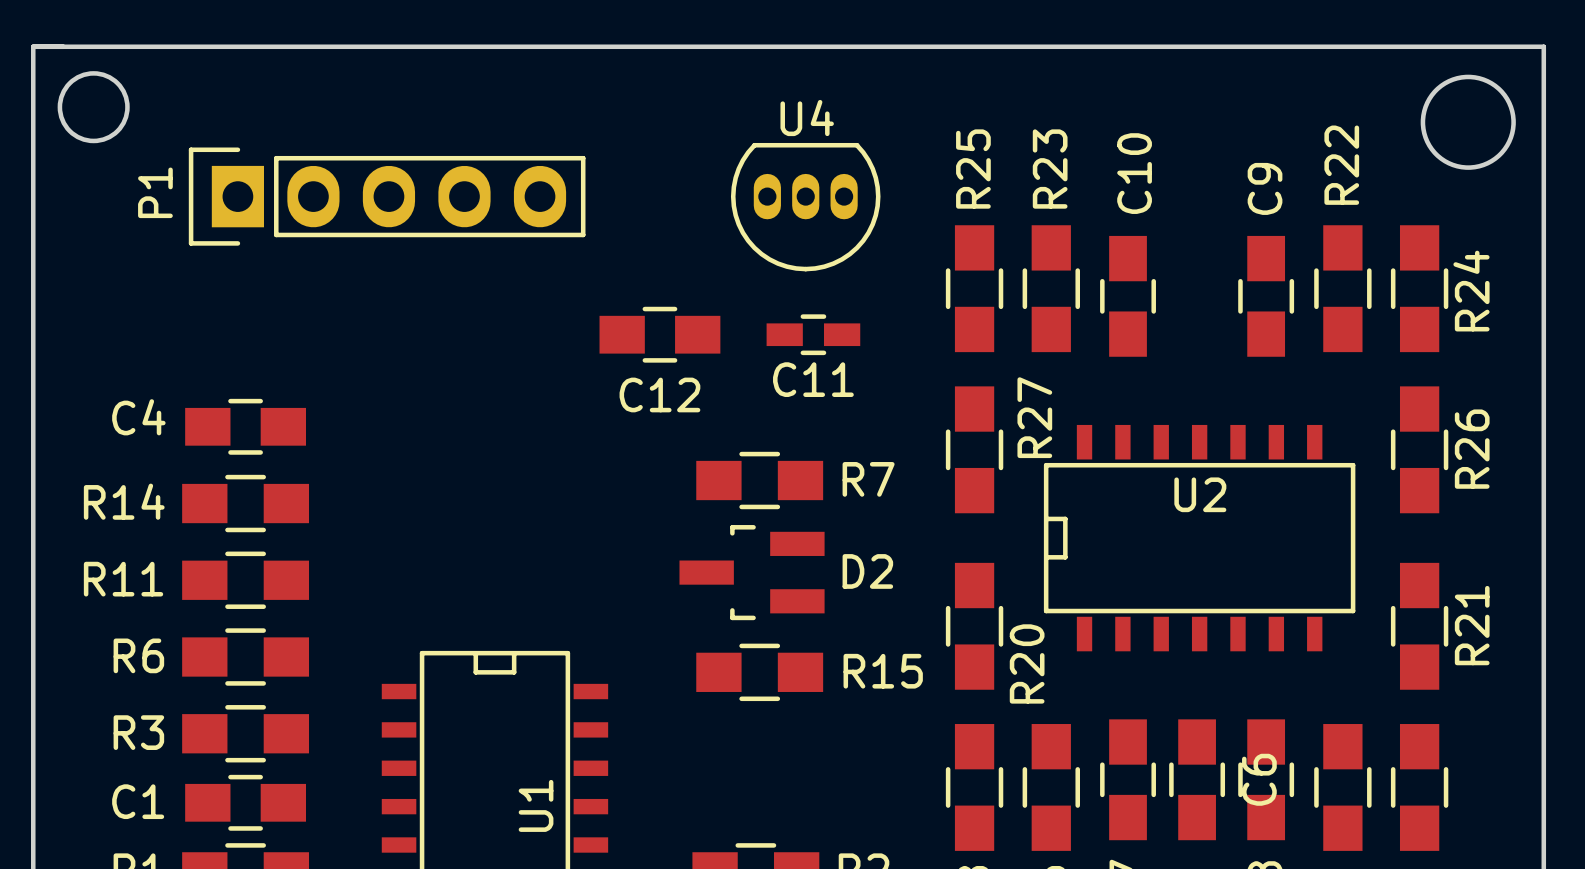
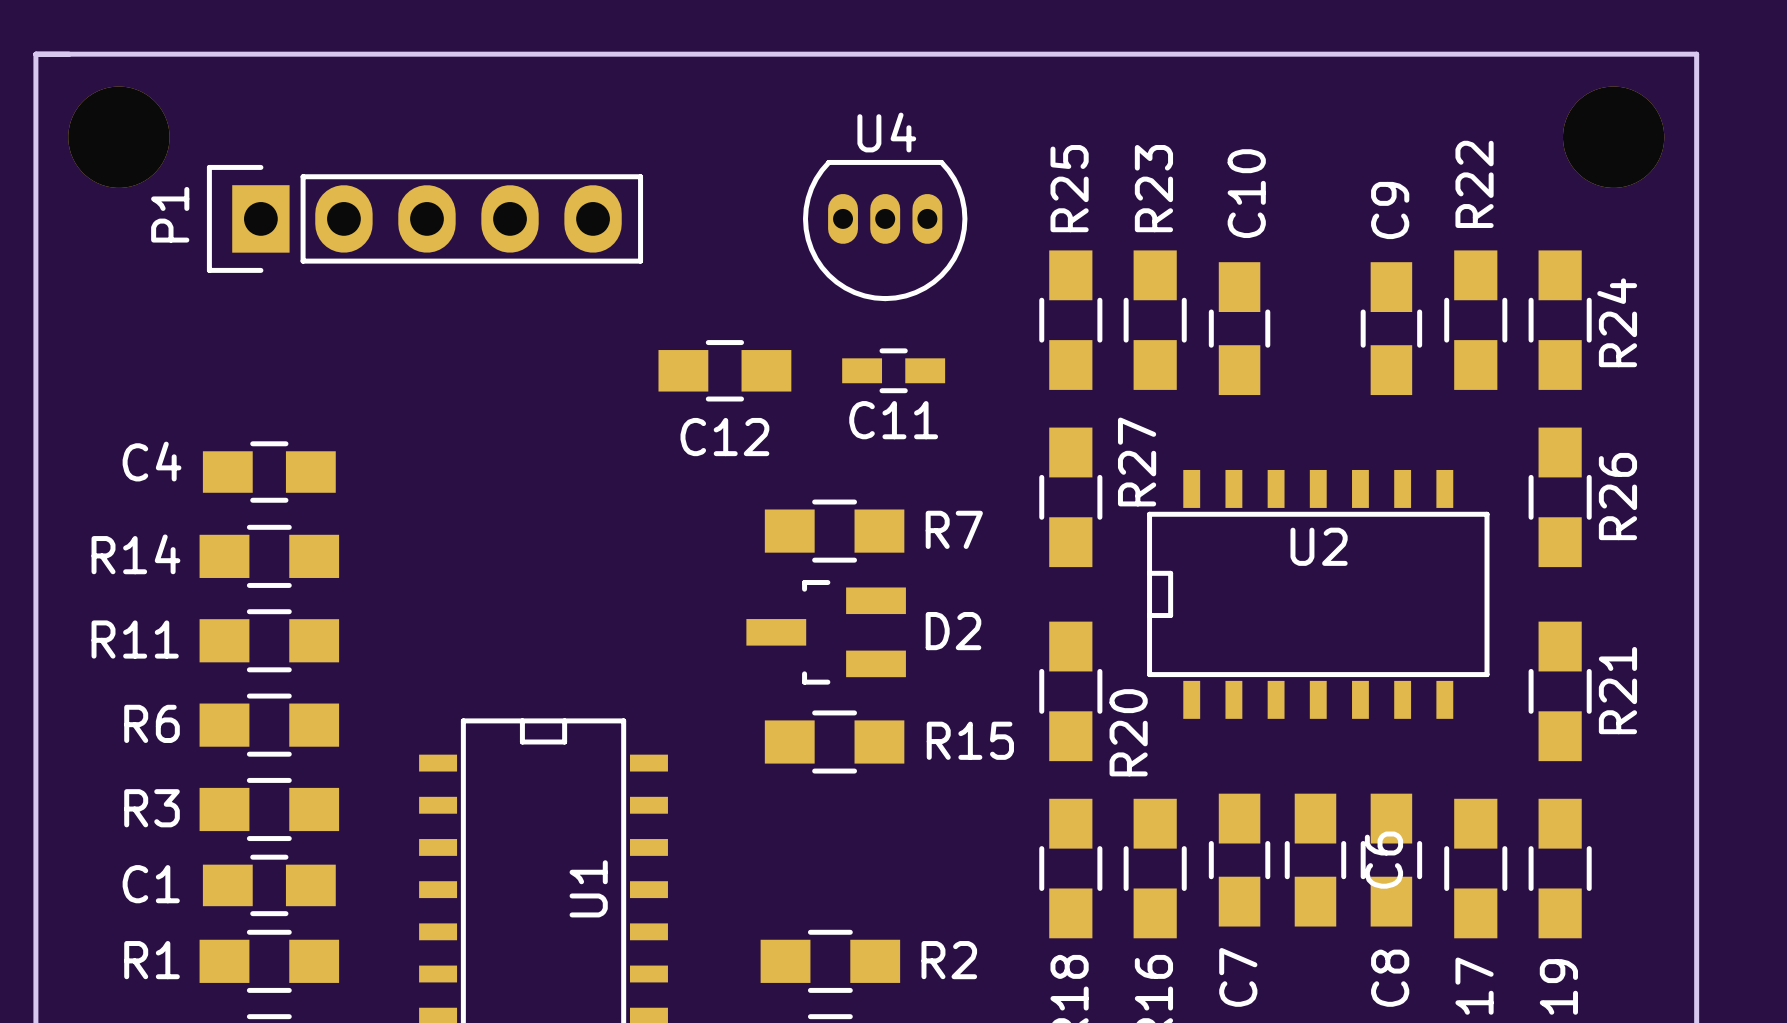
round board edge: [57, 71, 130, 144] -> none
round board edge: [1420, 74, 1516, 170] -> none
part: none -> (118, 137)
part: none -> (1613, 137)

